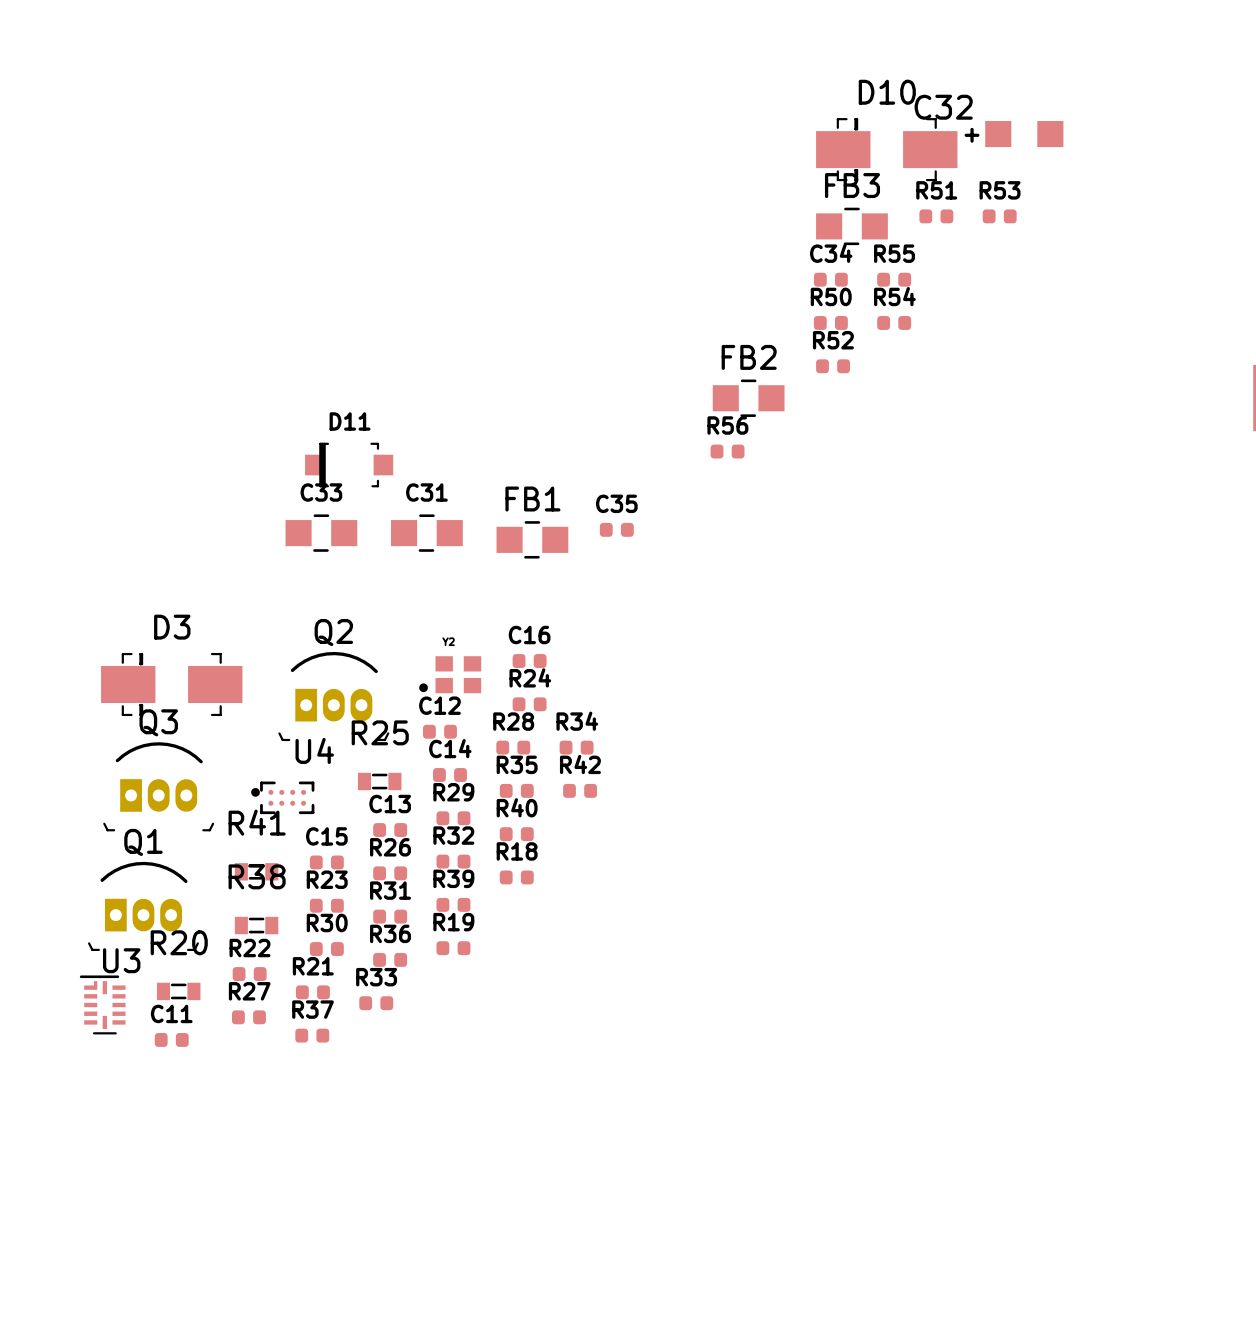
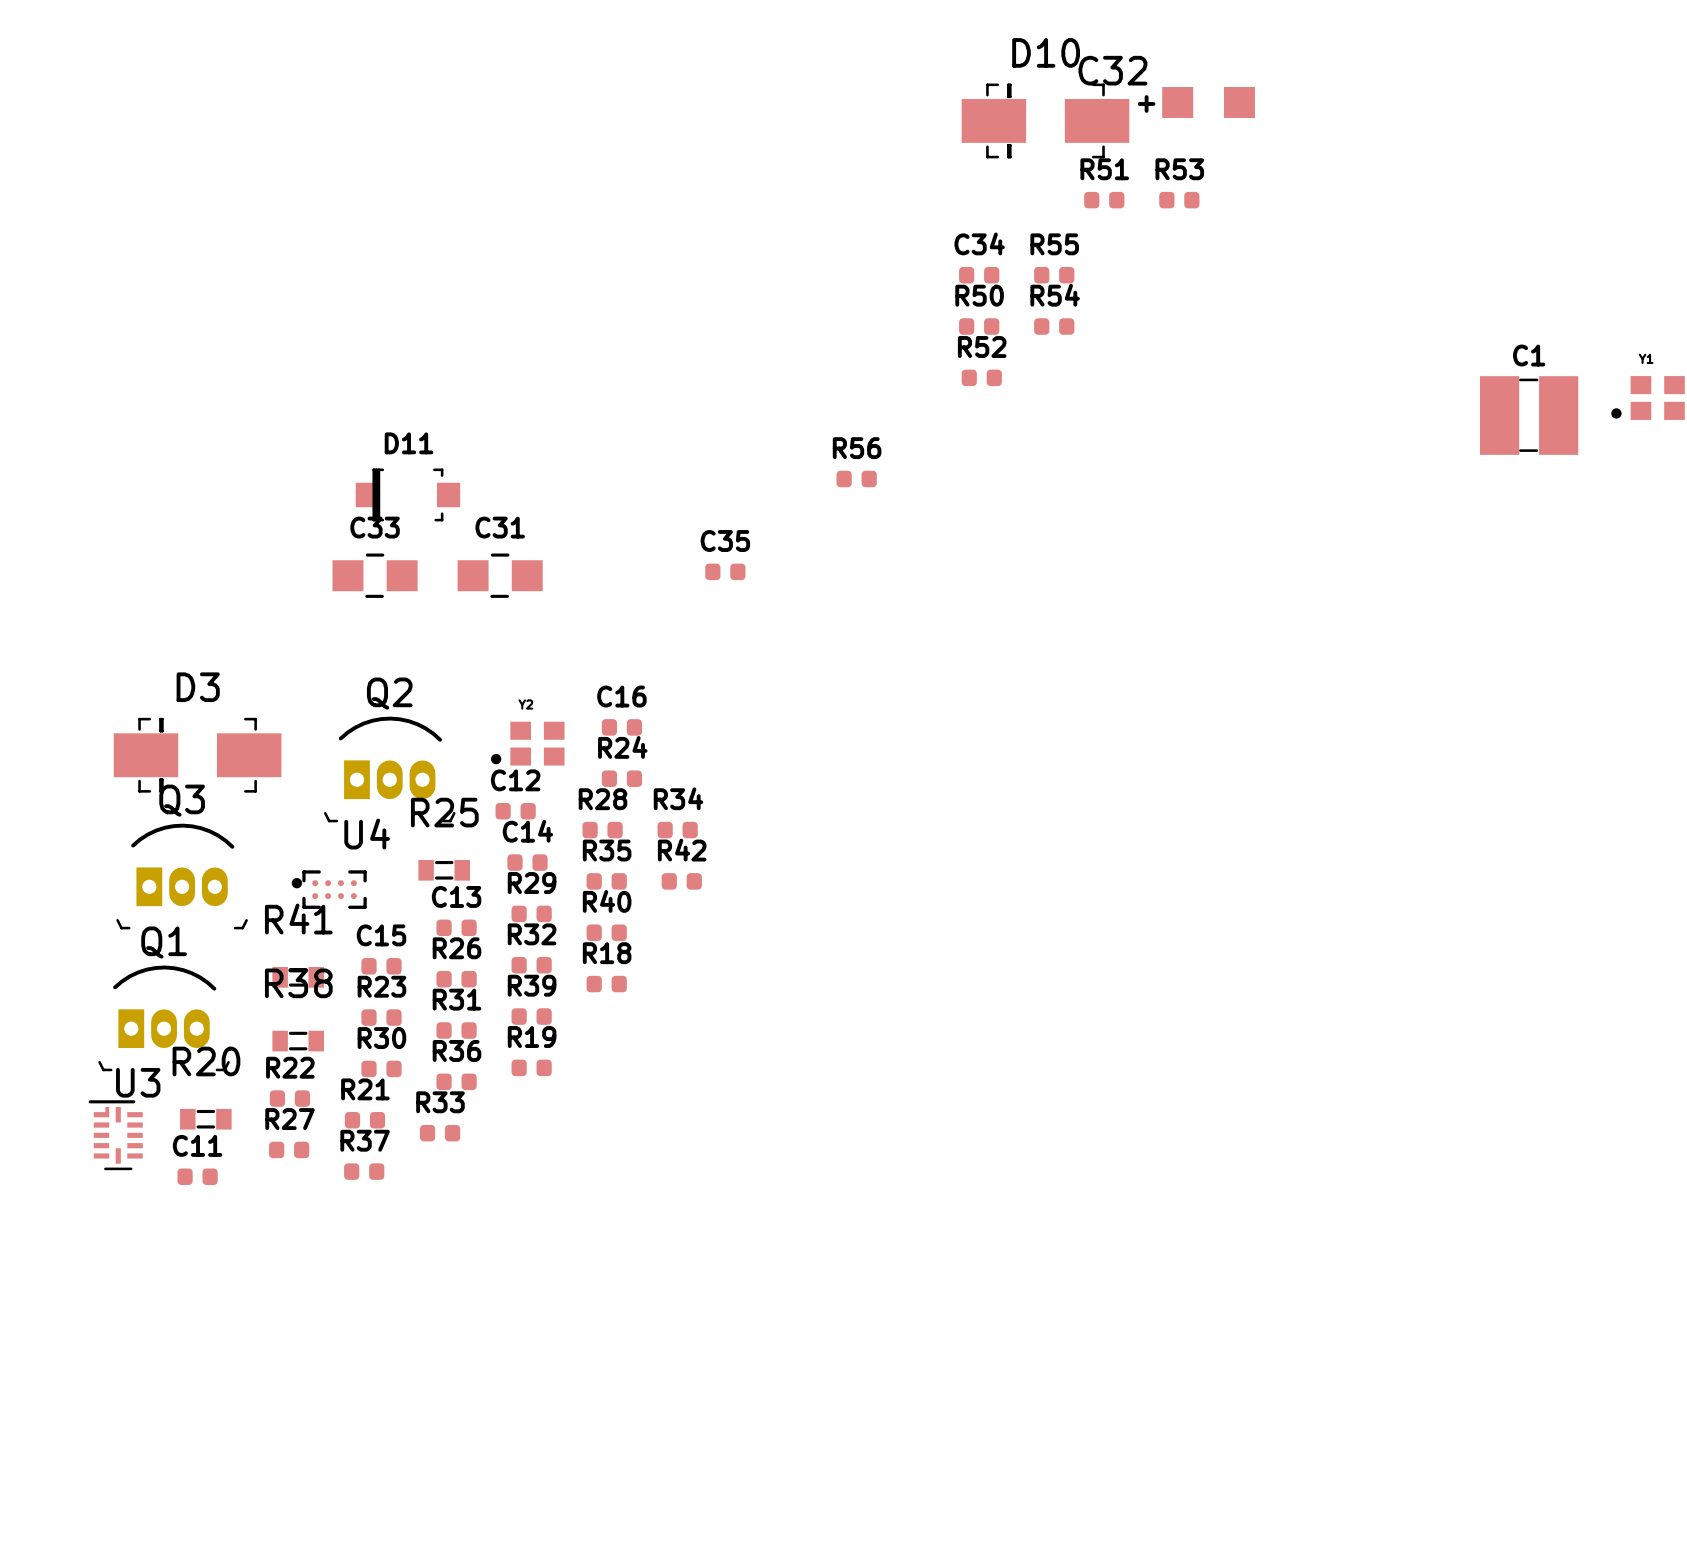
FB3: (851, 226) -> none
FB2: (748, 398) -> none
FB1: (532, 539) -> none

